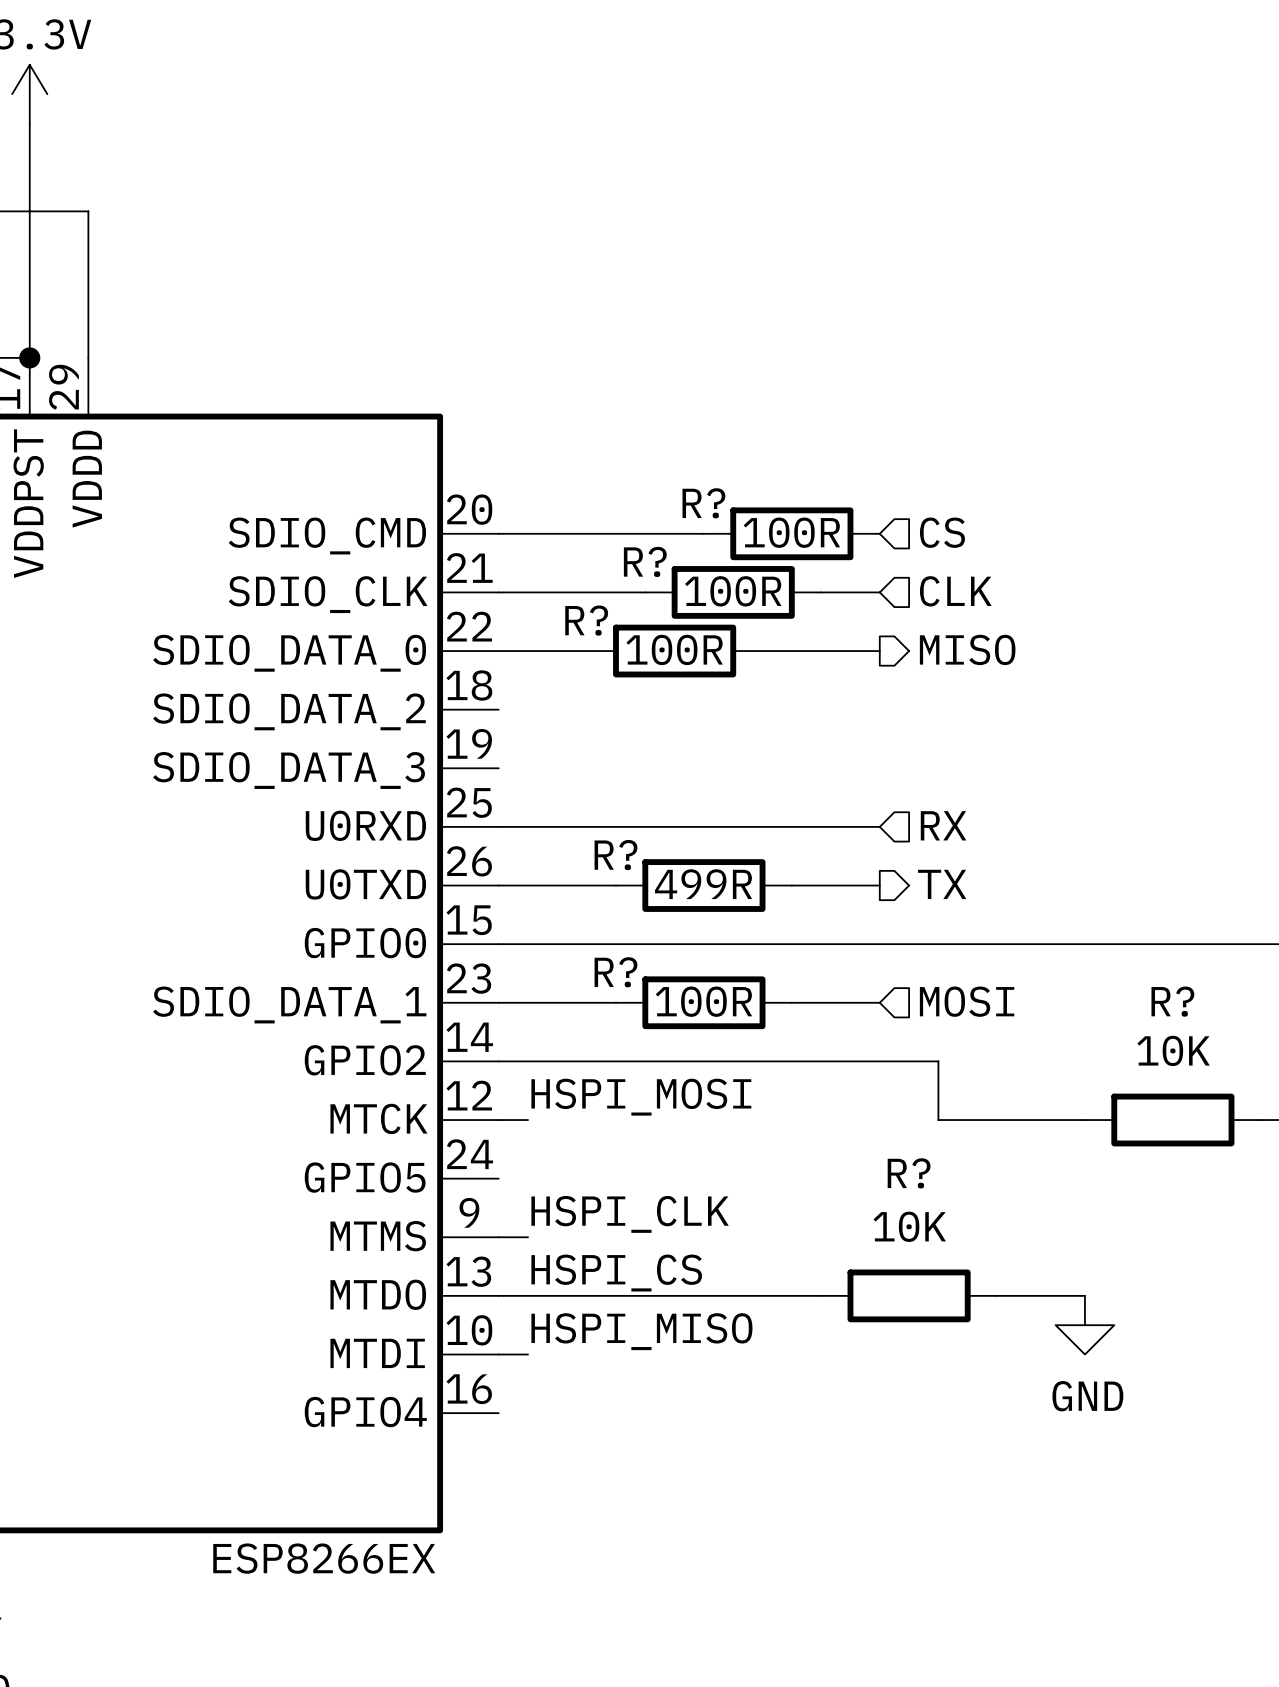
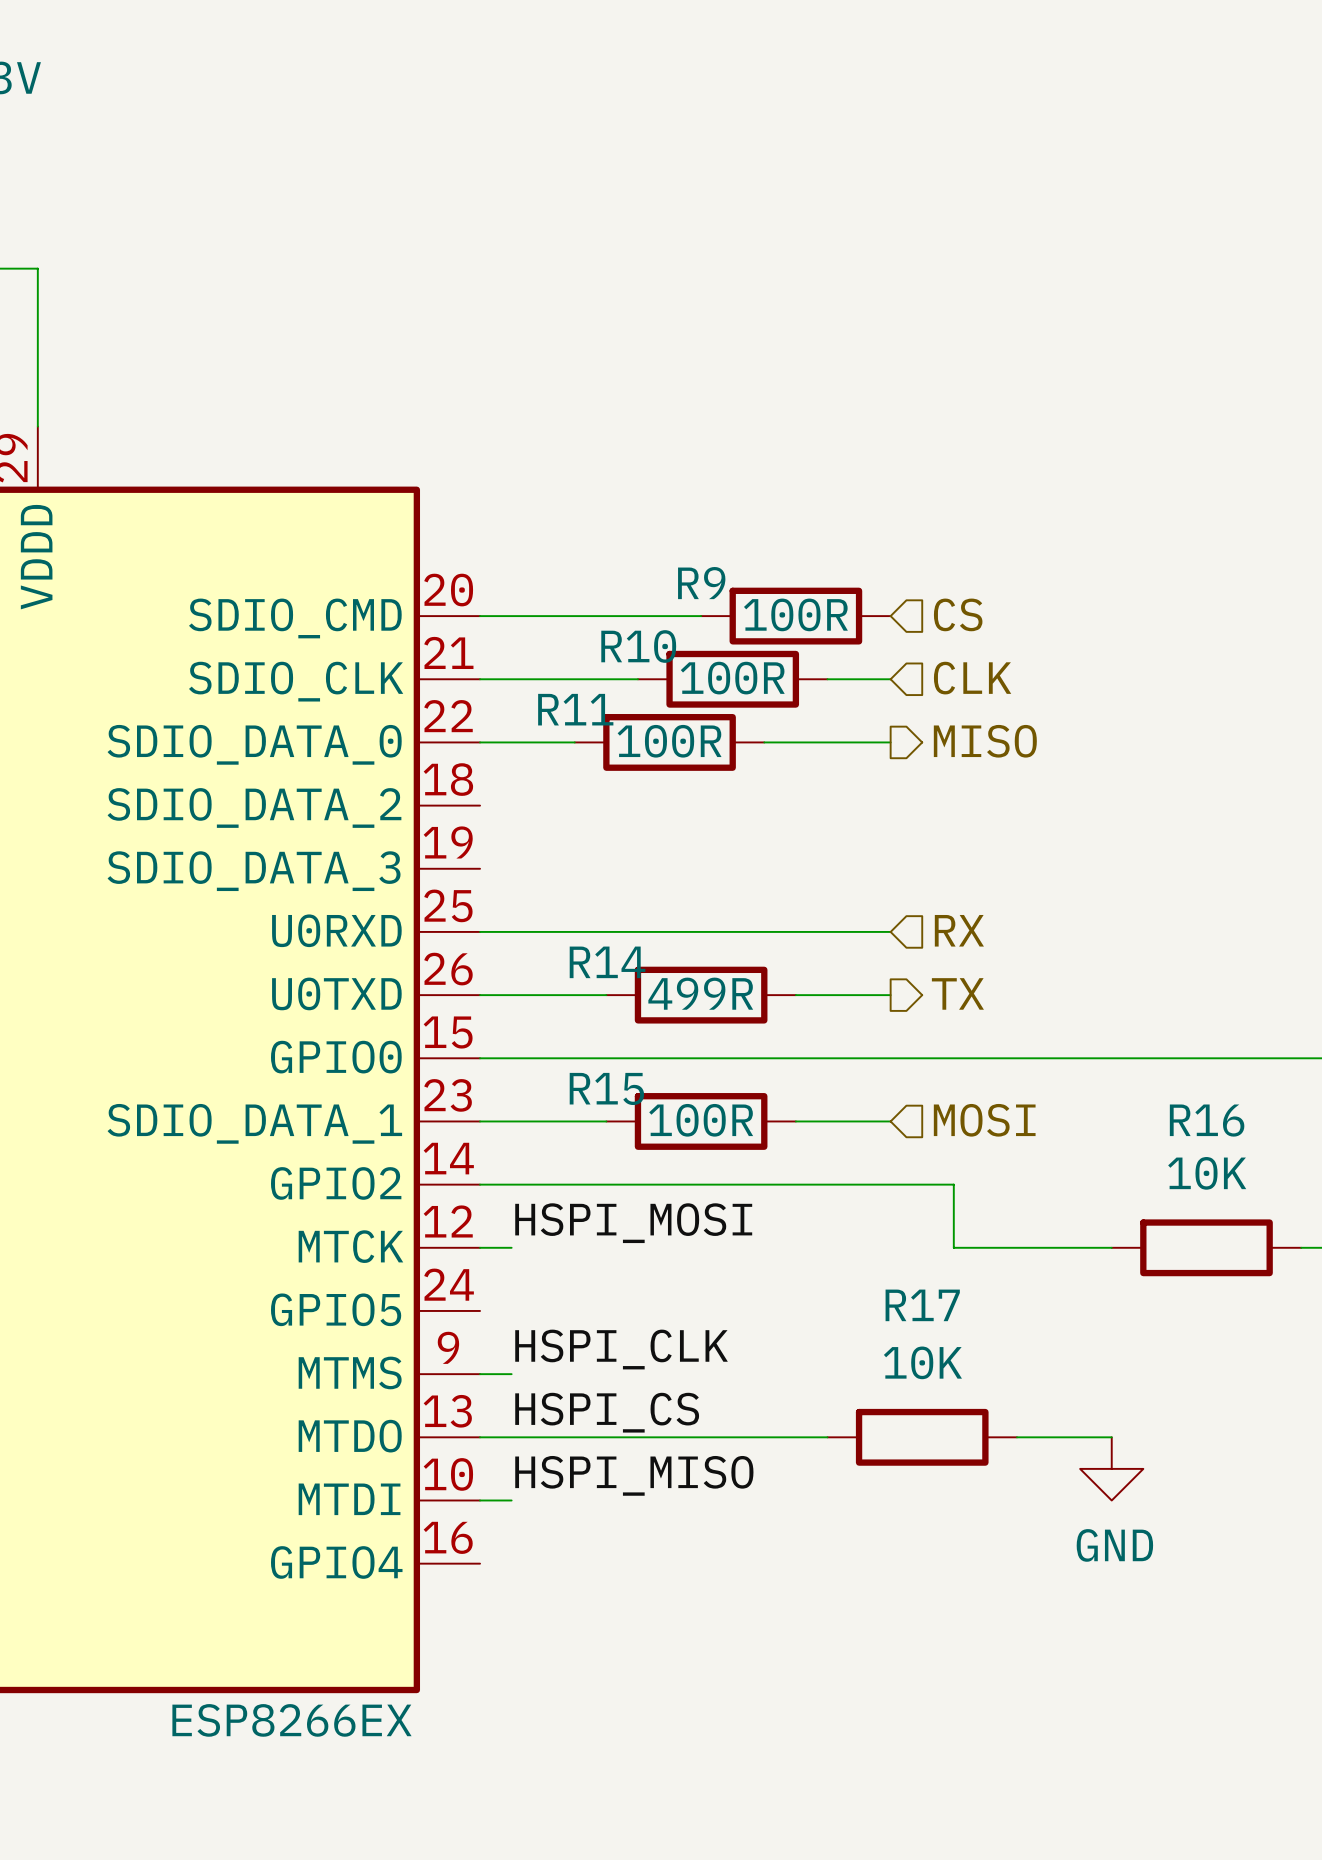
R? name: R? (703, 503) -> R9 (701, 583)
R? name: R? (645, 561) -> R10 (638, 646)
R? name: R? (586, 620) -> R11 (575, 709)
R? name: R? (615, 855) -> R14 (607, 962)
R? name: R? (615, 972) -> R15 (606, 1088)
R? name: R? (1172, 1001) -> R16 (1207, 1120)
R? name: R? (909, 1173) -> R17 (922, 1305)

